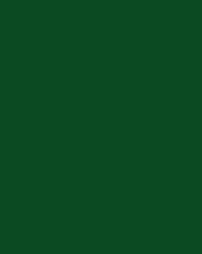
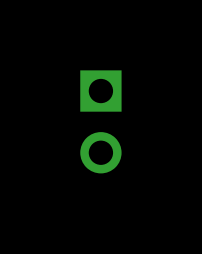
part: none -> (100, 121)

